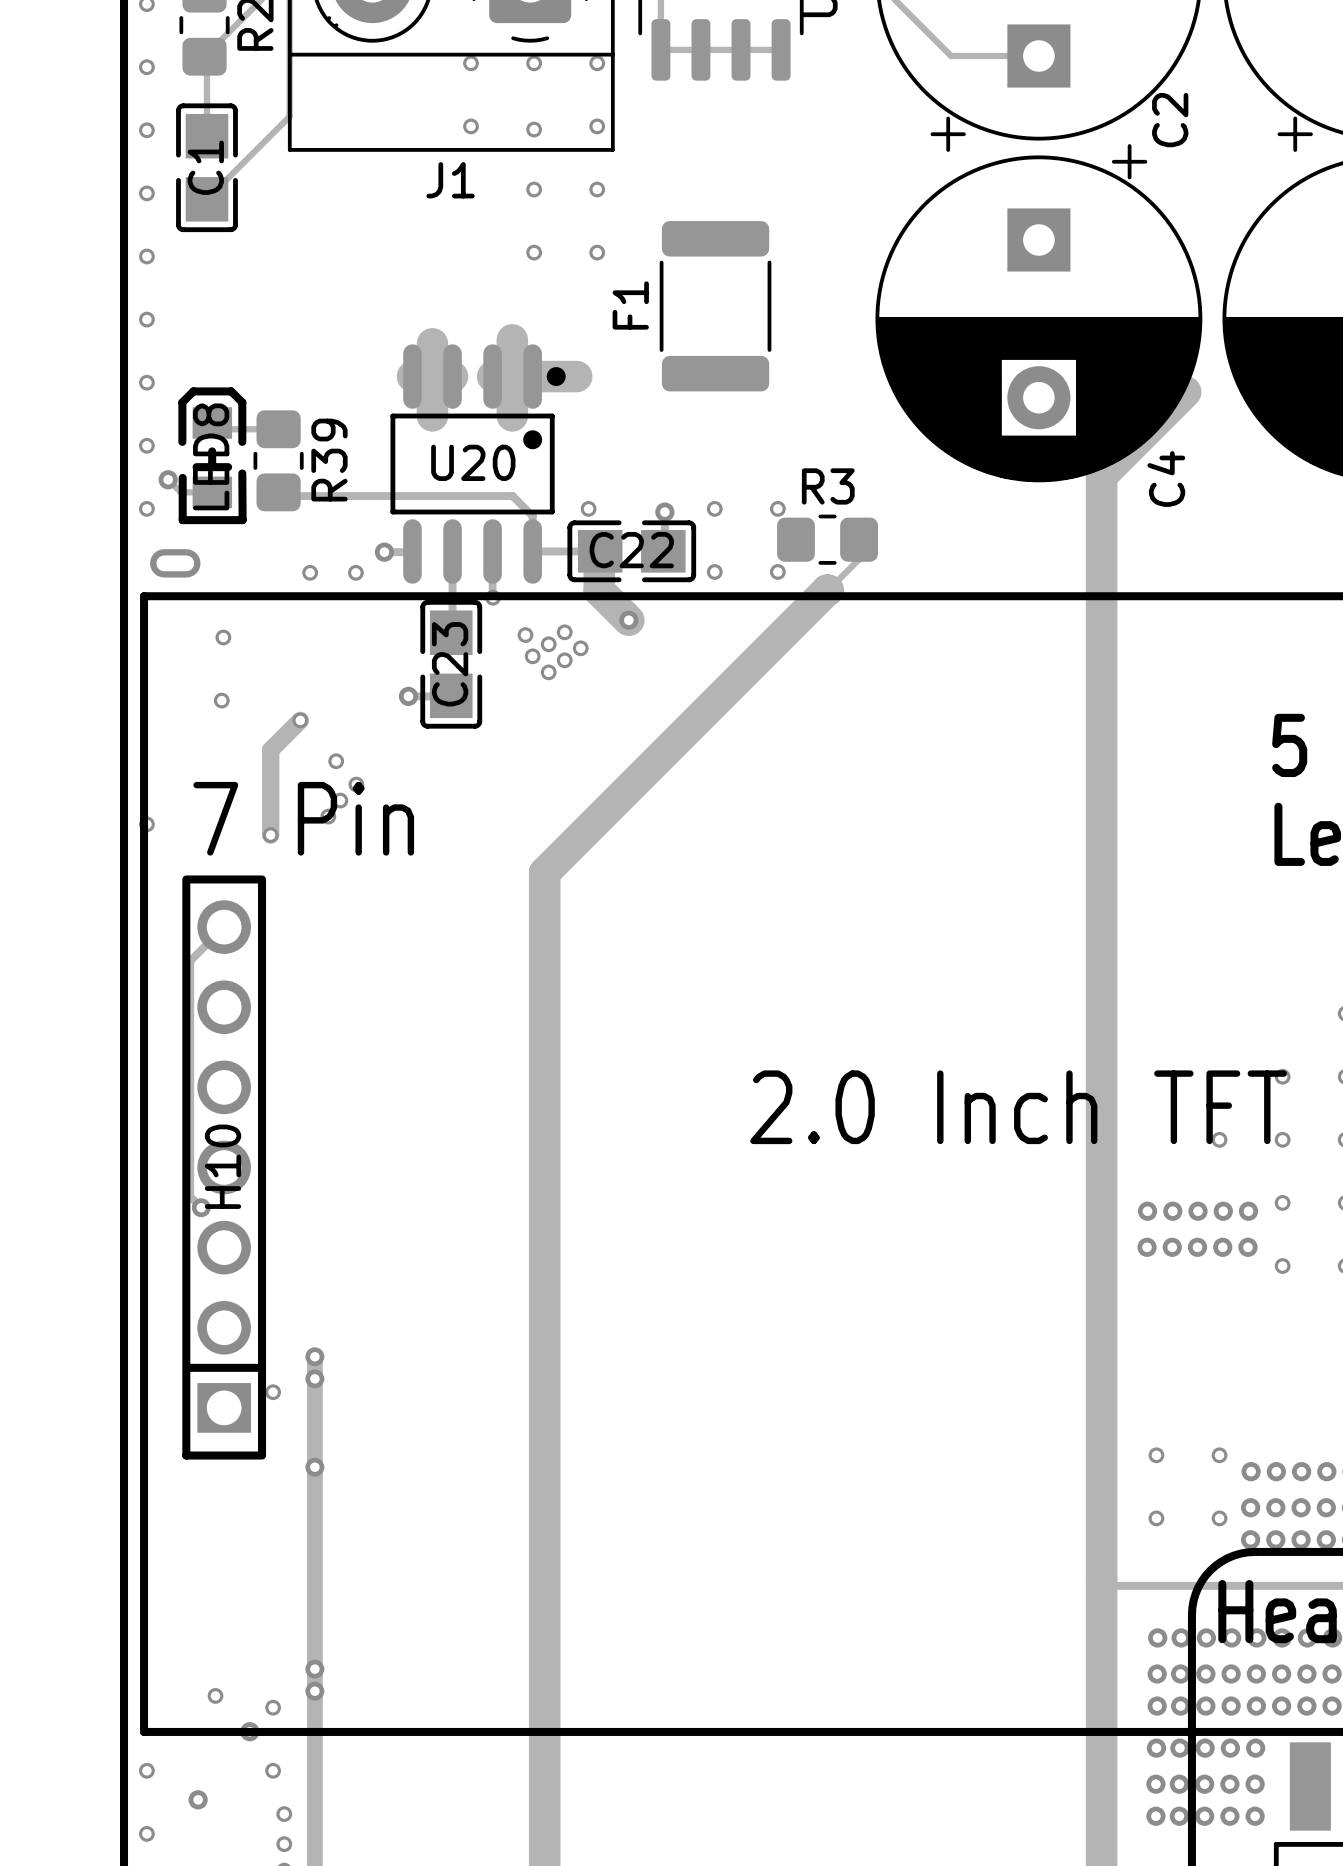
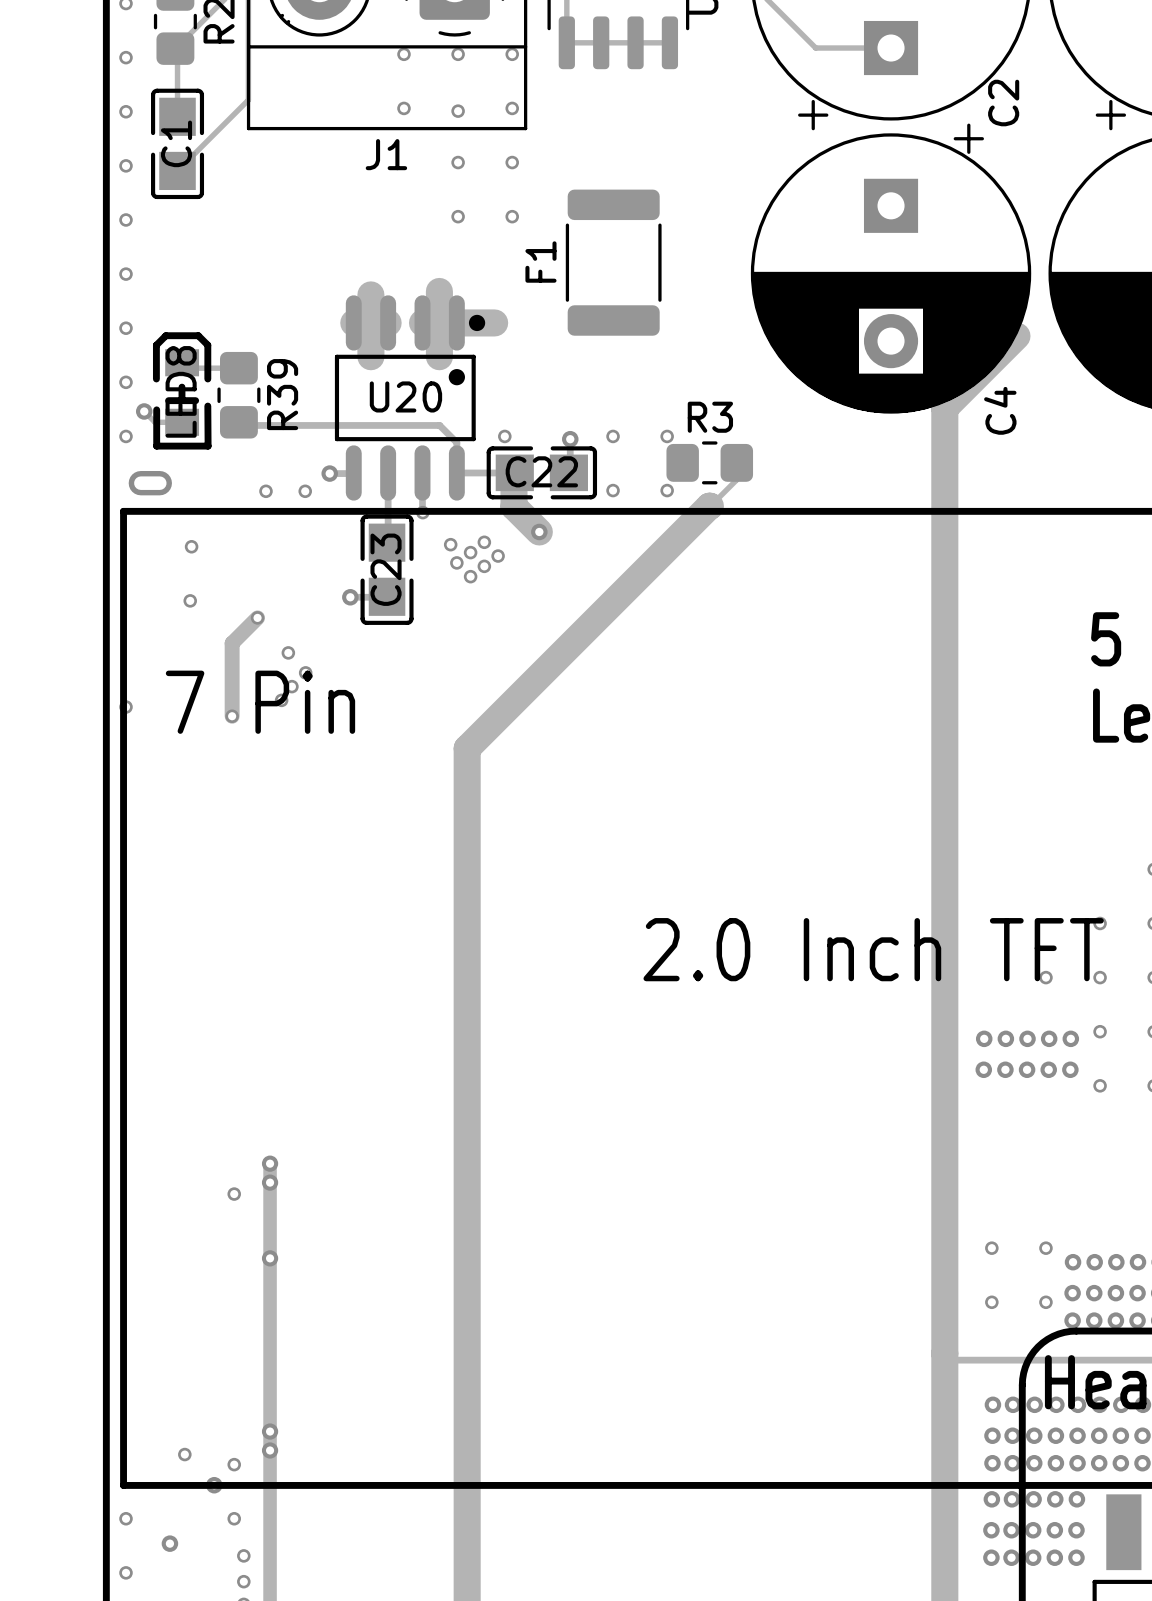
track: (224, 927) (190, 961) (190, 1196) (201, 1207) -> none
H10: (224, 1167) -> none
via: (201, 1207) -> none

